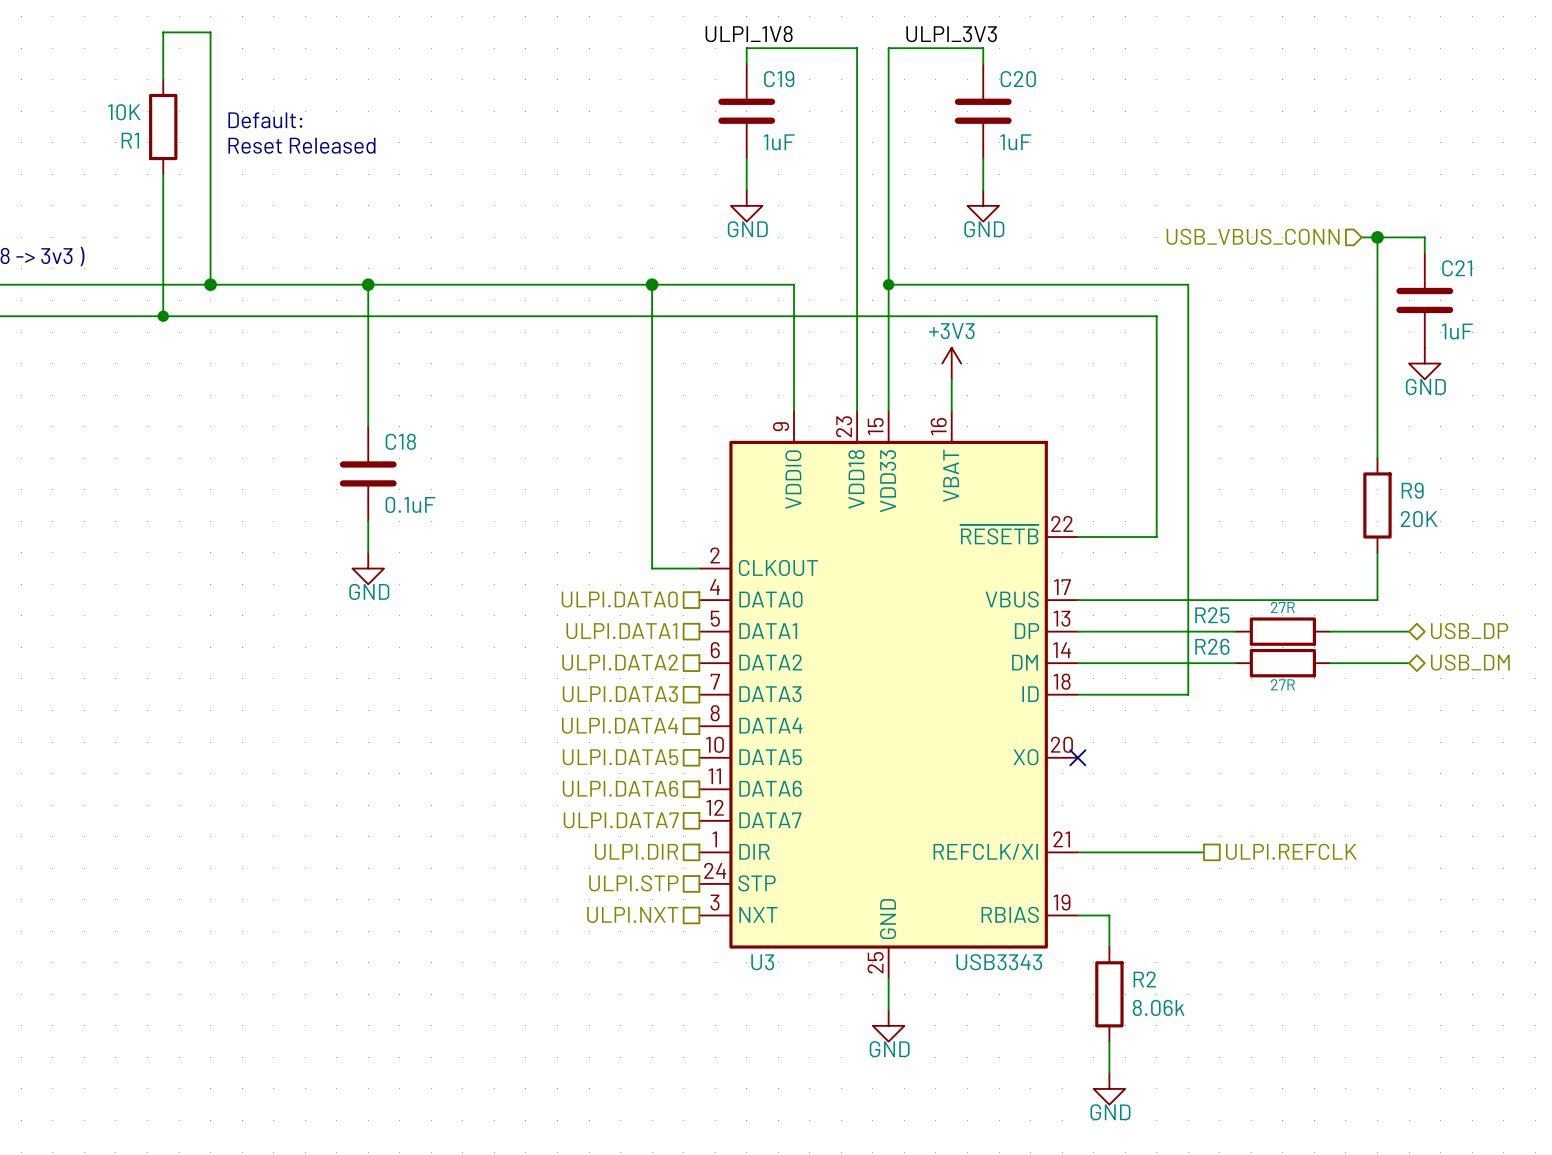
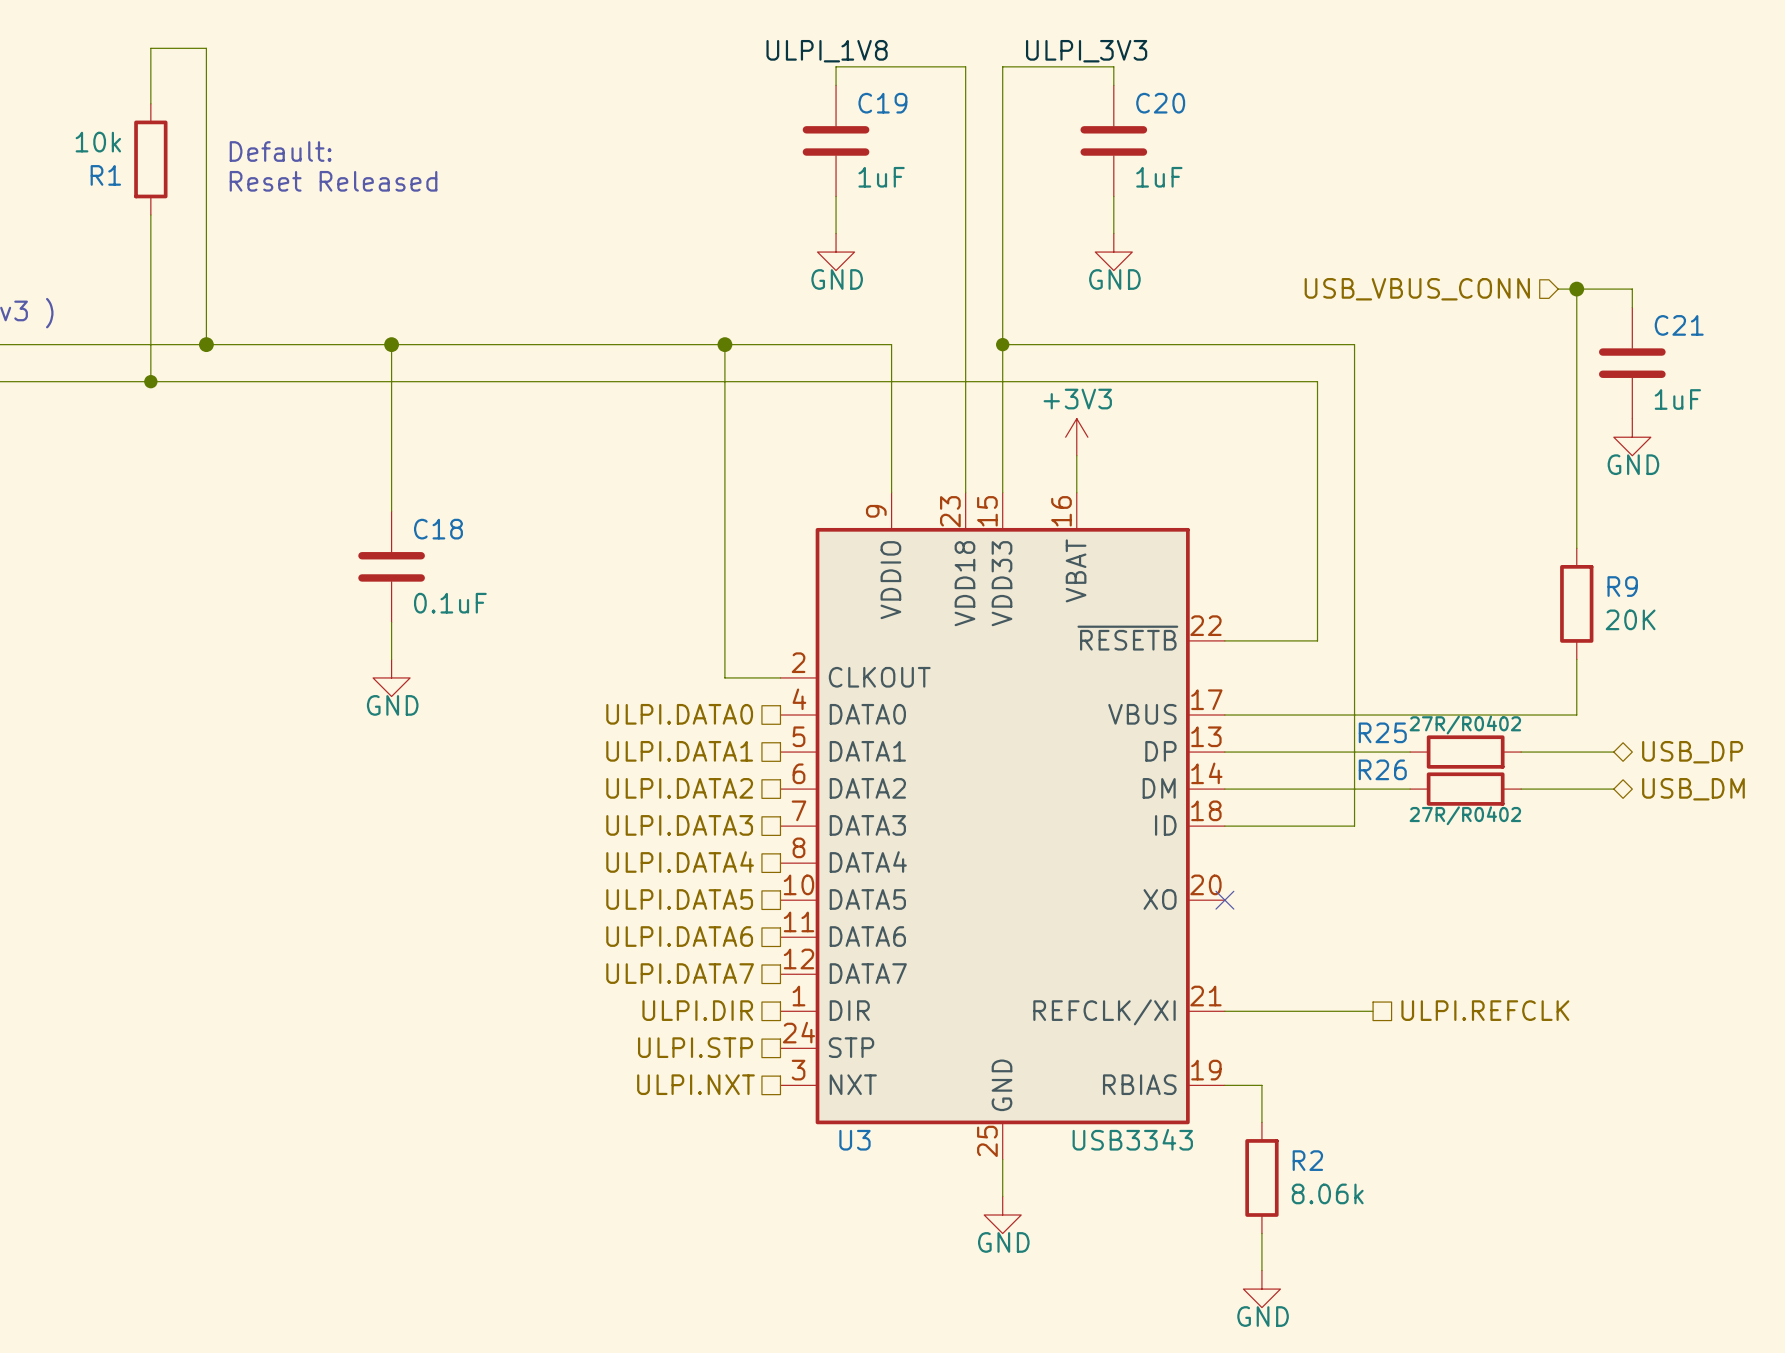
R1 value: 10K (124, 112) -> 10k (98, 142)
R25 value: 27R (1282, 607) -> 27R/R0402 (1465, 725)
R26 value: 27R (1282, 684) -> 27R/R0402 (1465, 815)

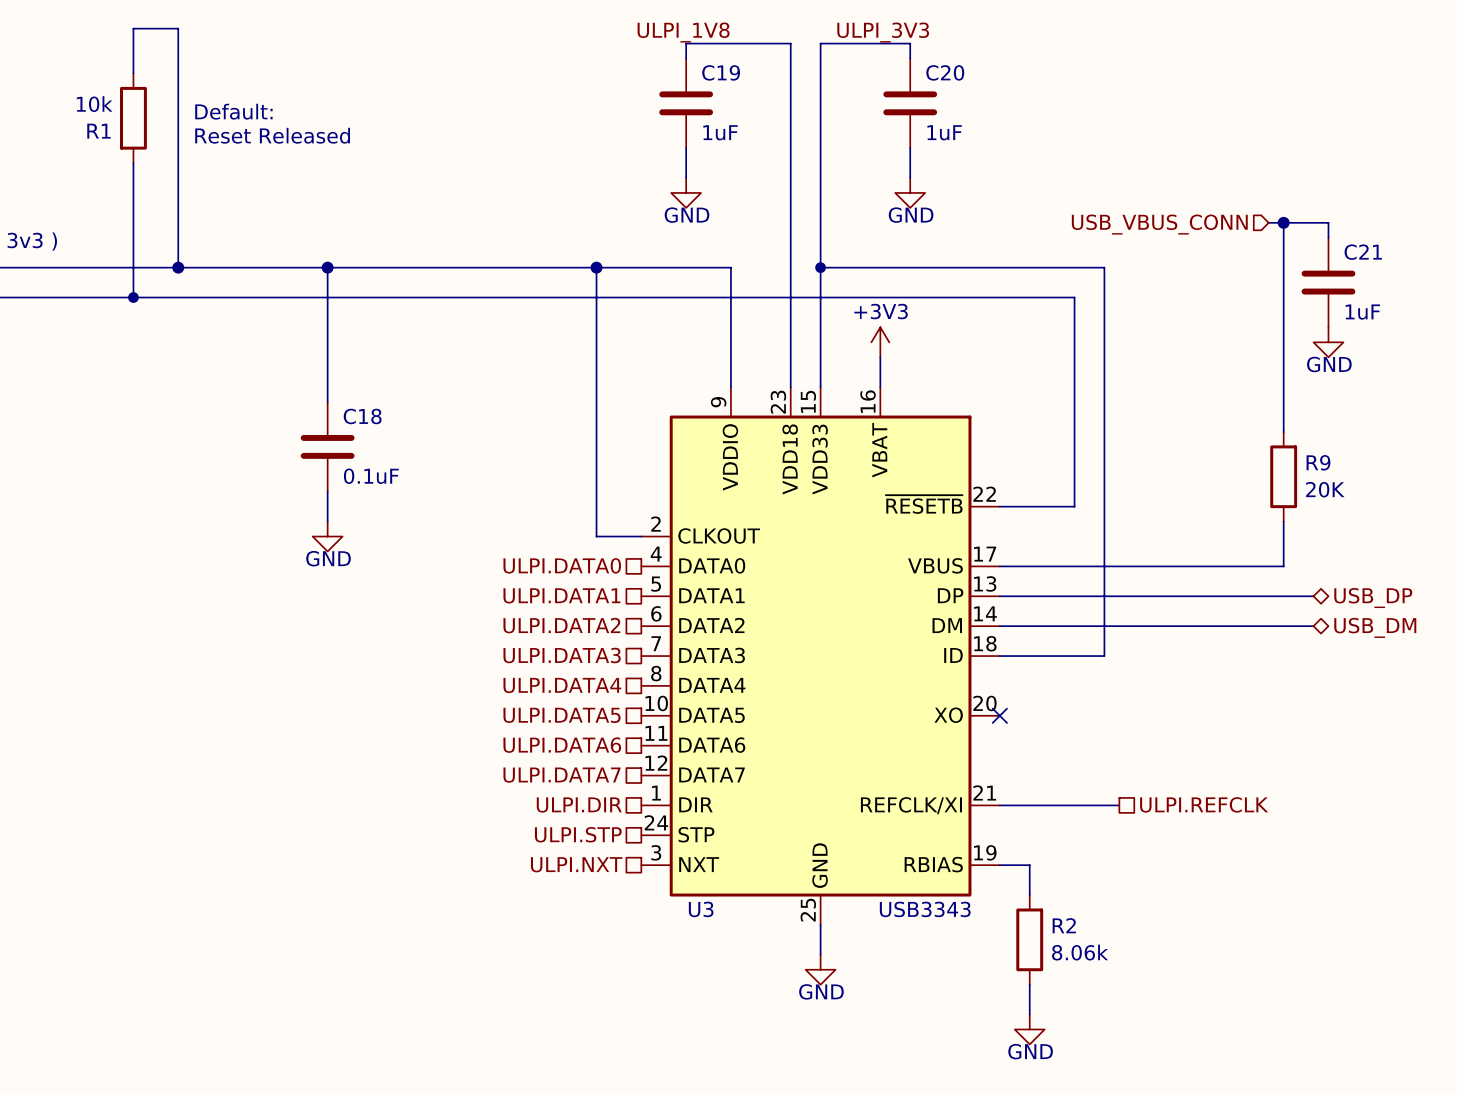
wire: none -> (1149, 596) (1238, 596)
R25: 27R/R0402 (1465, 752) -> none
wire: none -> (1149, 626) (1238, 626)
R26: 27R/R0402 (1465, 789) -> none

